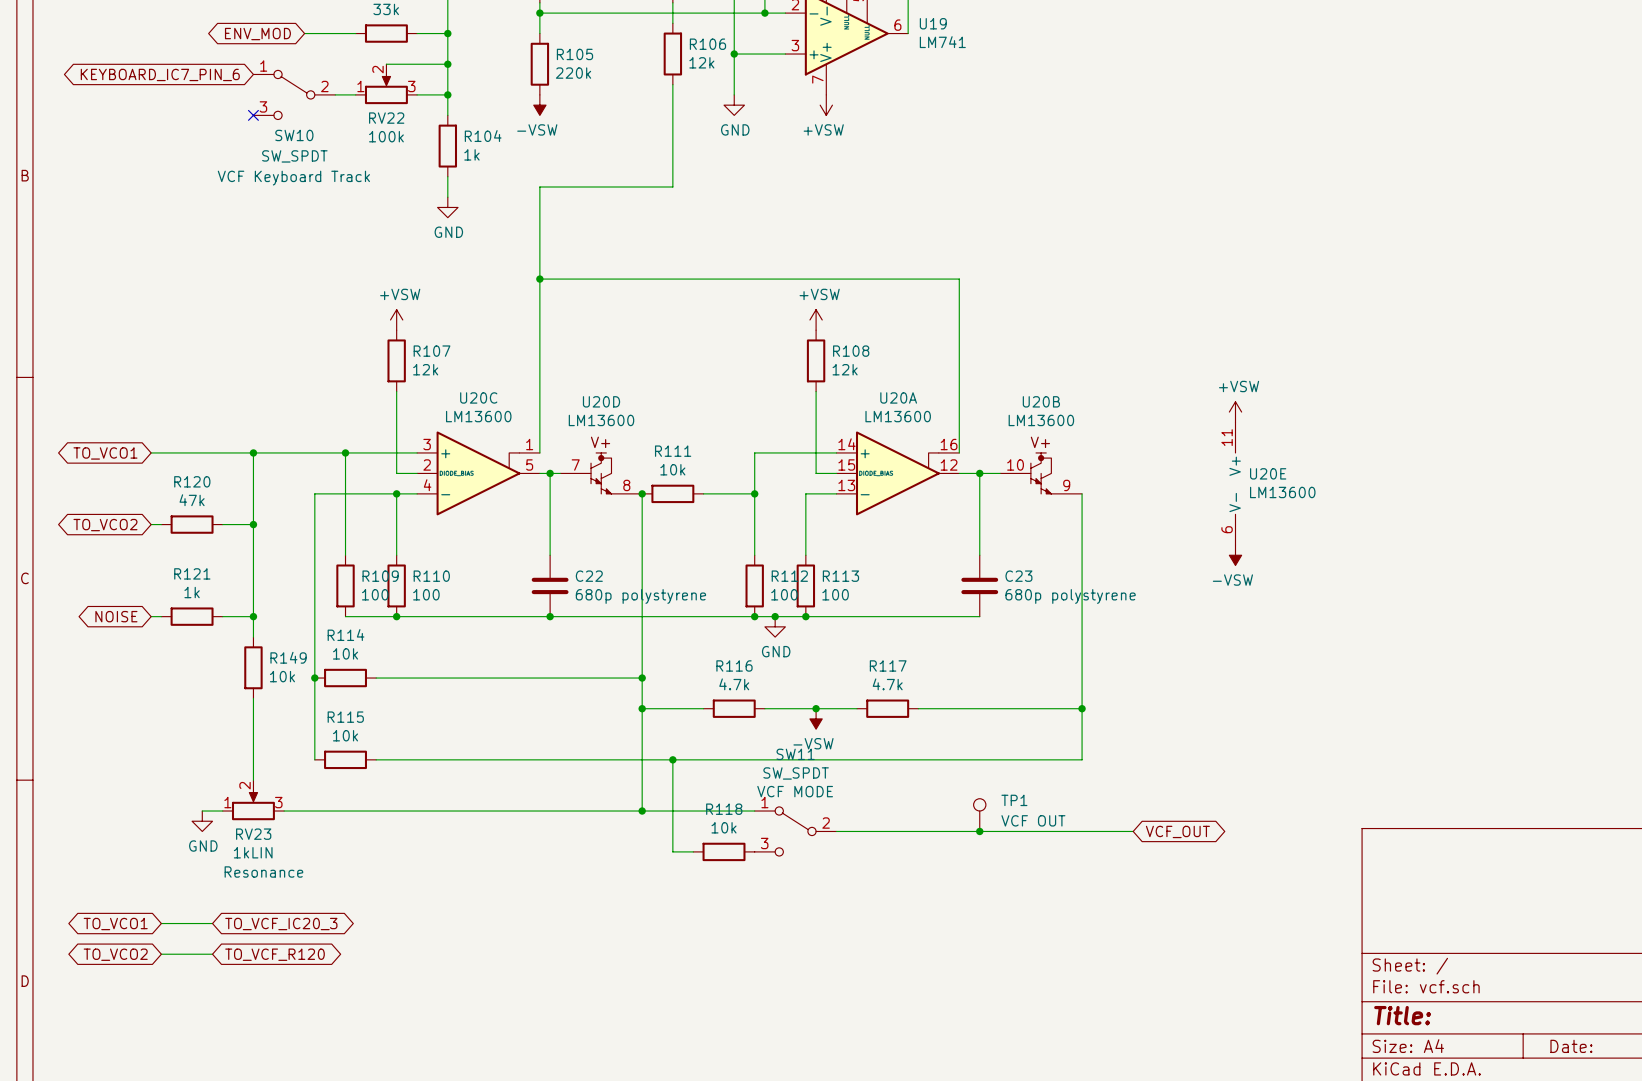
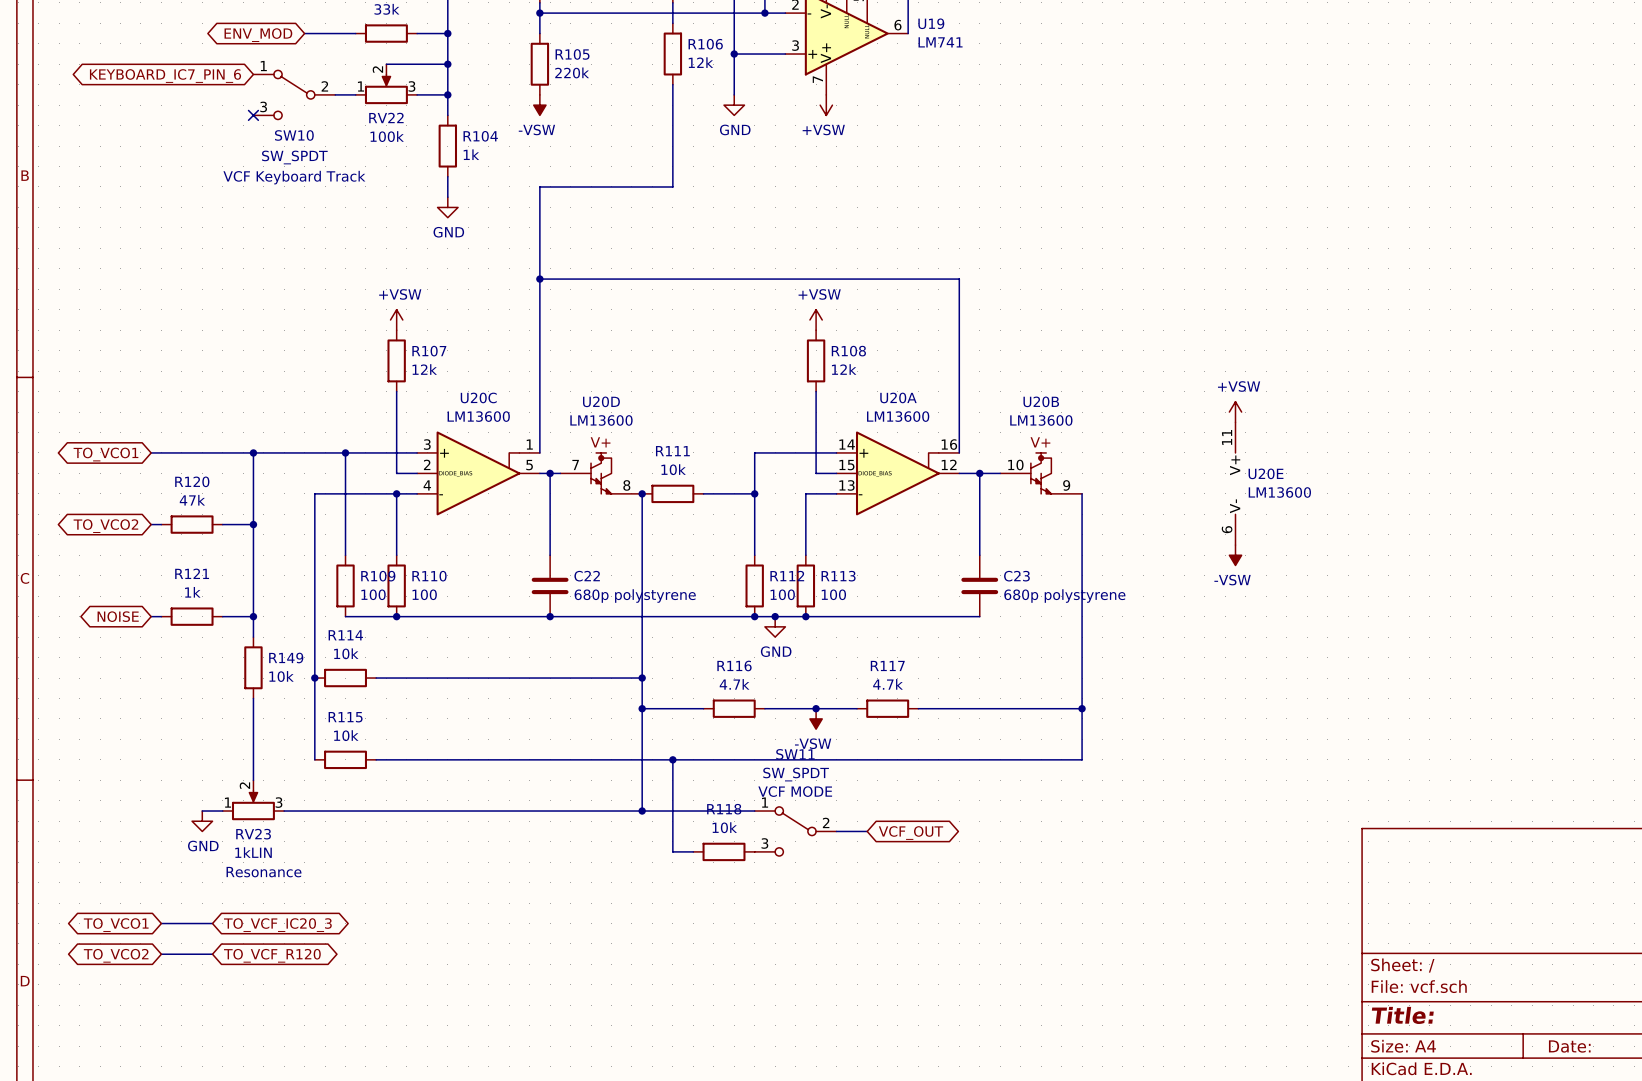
TP1: VCF OUT (979, 815) -> none
wire: (867, 831) (1133, 831) -> none
global label: none -> VCF_OUT (910, 833)
junction: (979, 831) -> none
global label: VCF_OUT (1177, 831) -> none

